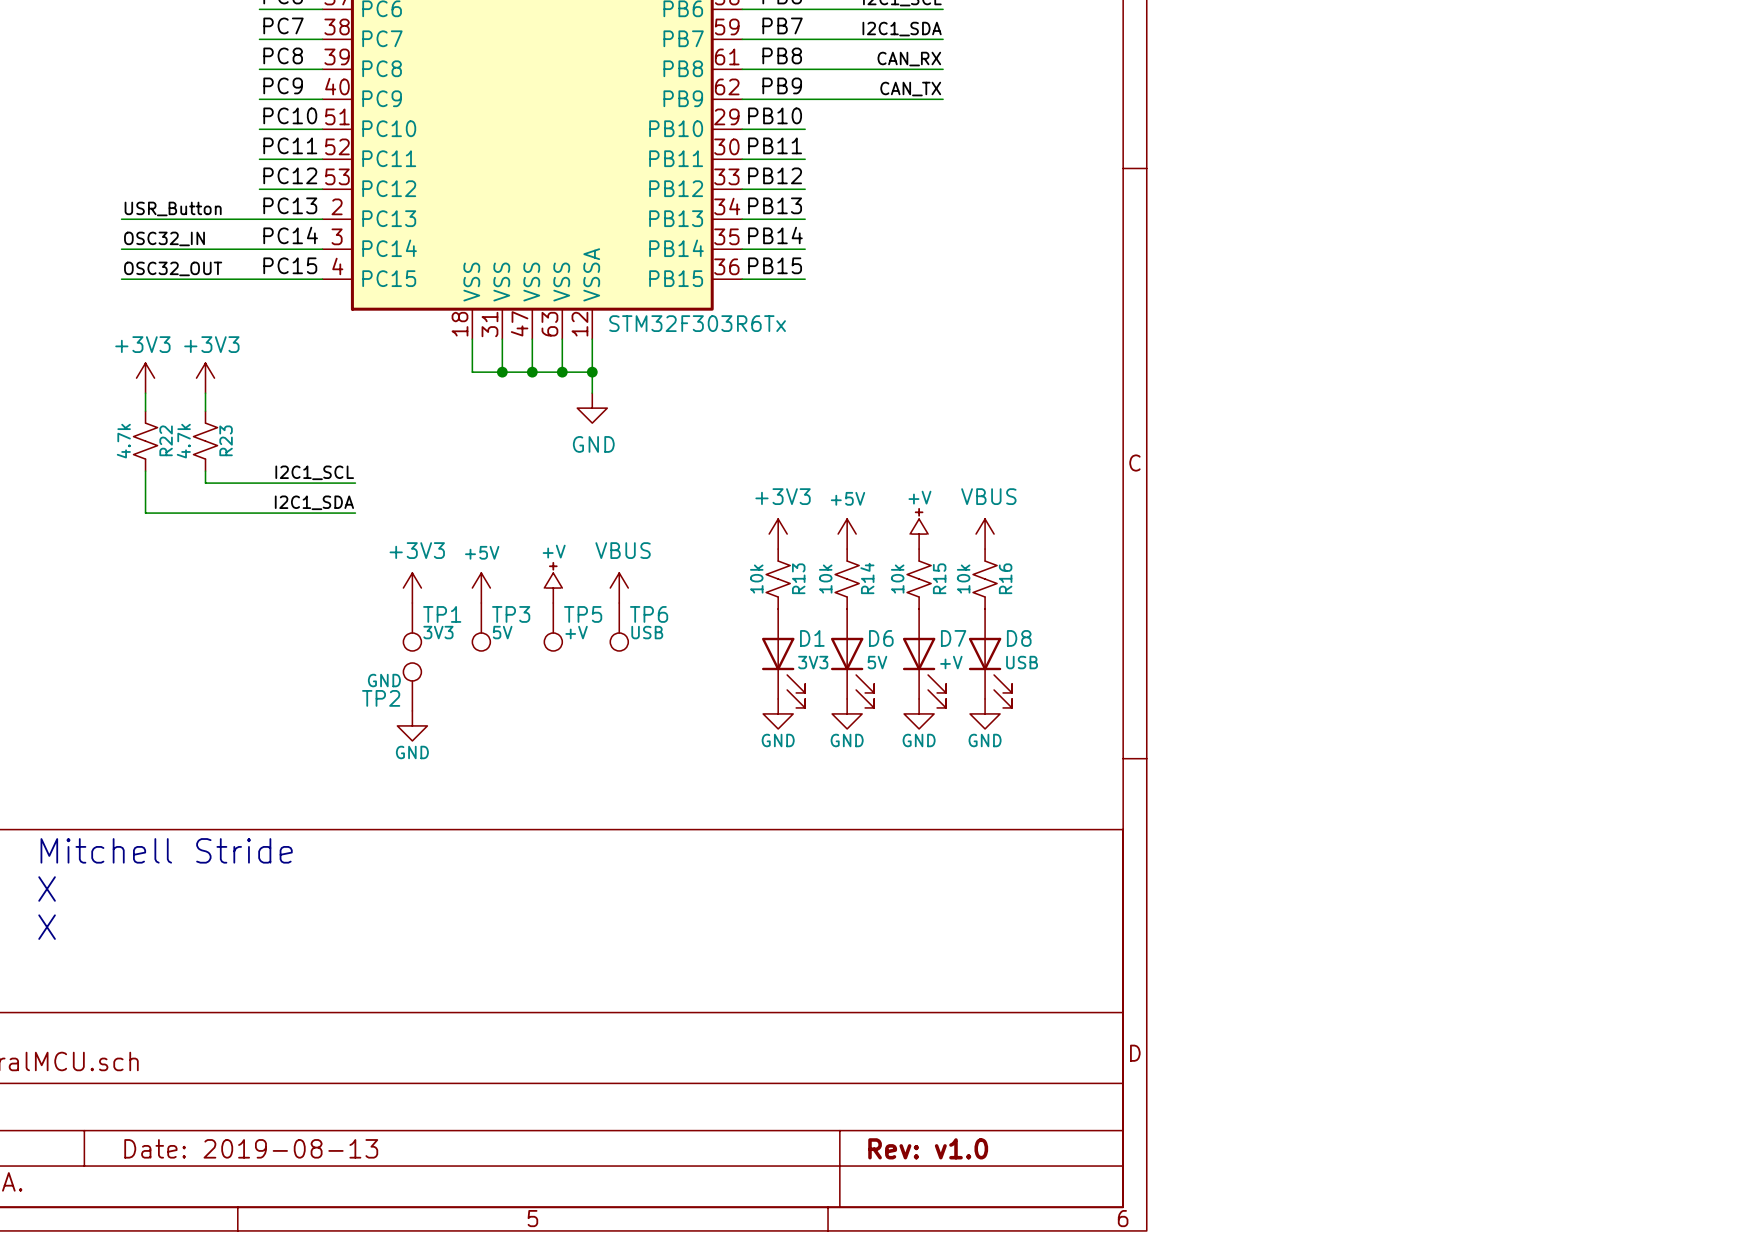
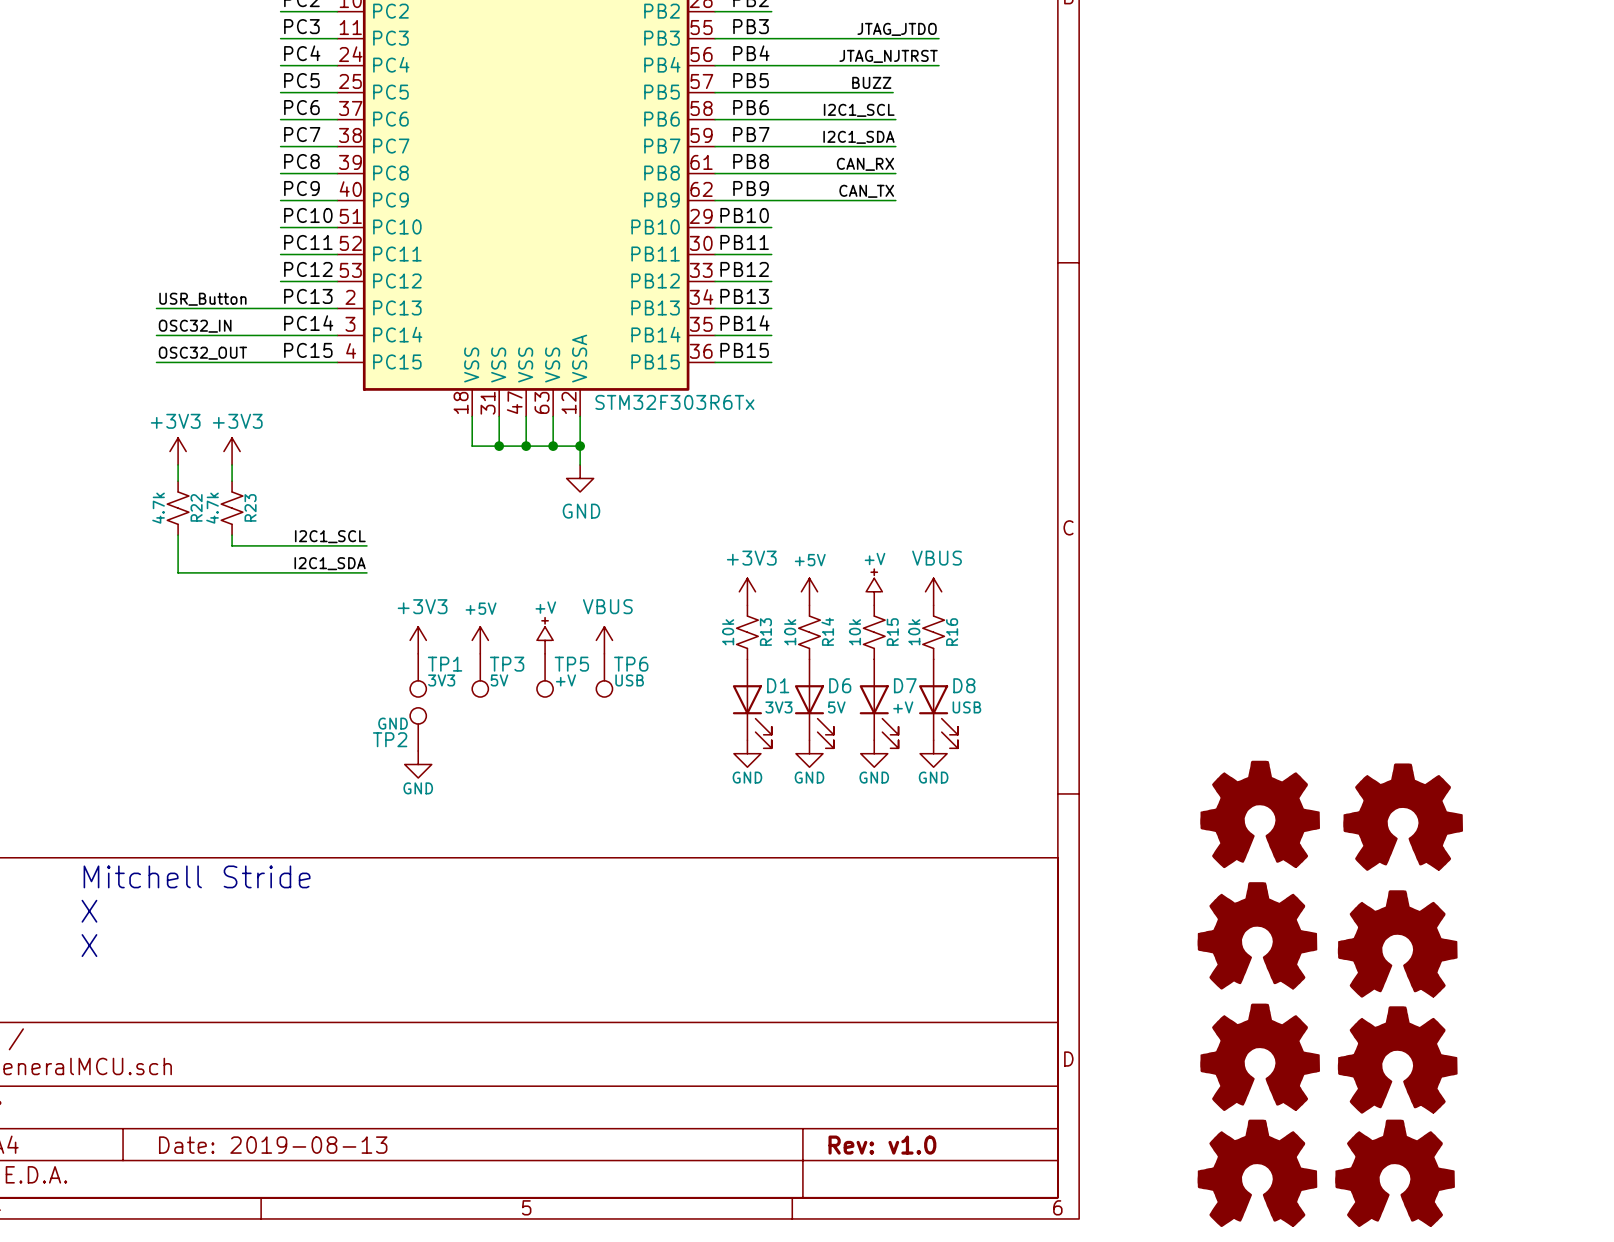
part: none -> (1260, 814)
part: none -> (1403, 817)
part: none -> (1257, 935)
part: none -> (1397, 943)
part: none -> (1260, 1057)
part: none -> (1397, 1059)
part: none -> (1257, 1173)
part: none -> (1395, 1173)

